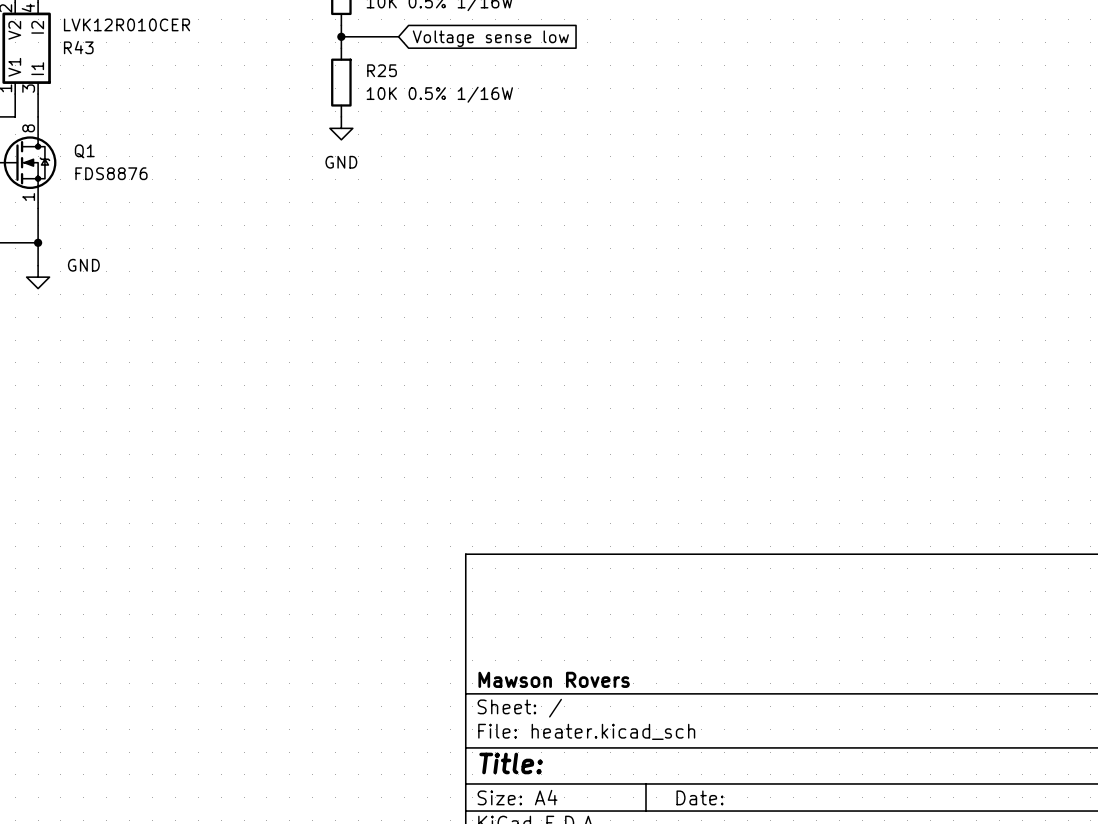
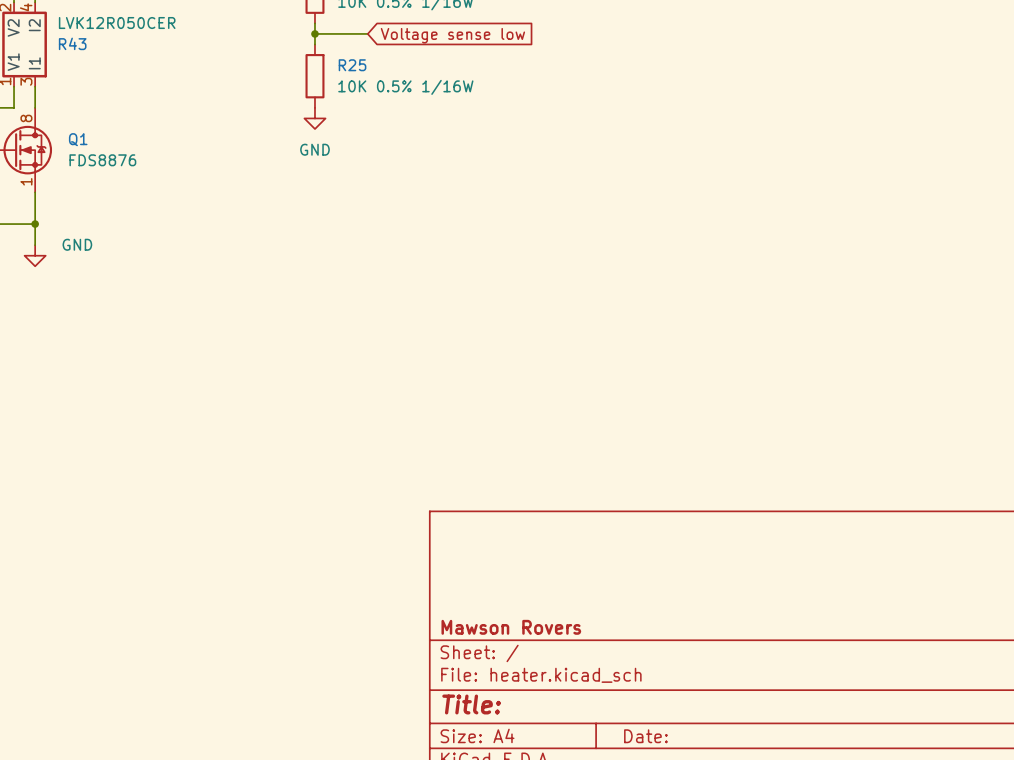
R43 value: LVK12R010CER (127, 24) -> LVK12R050CER (117, 23)

